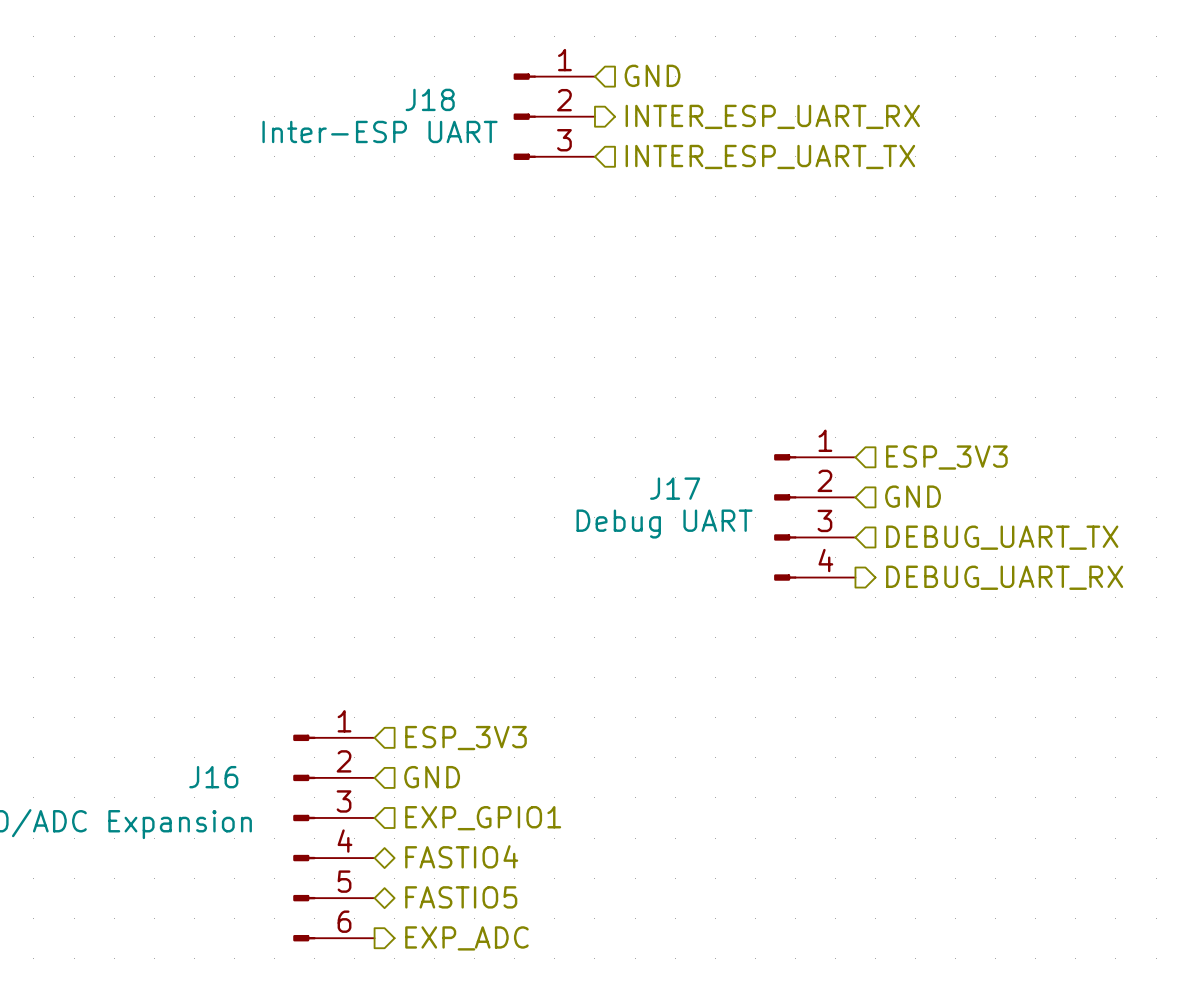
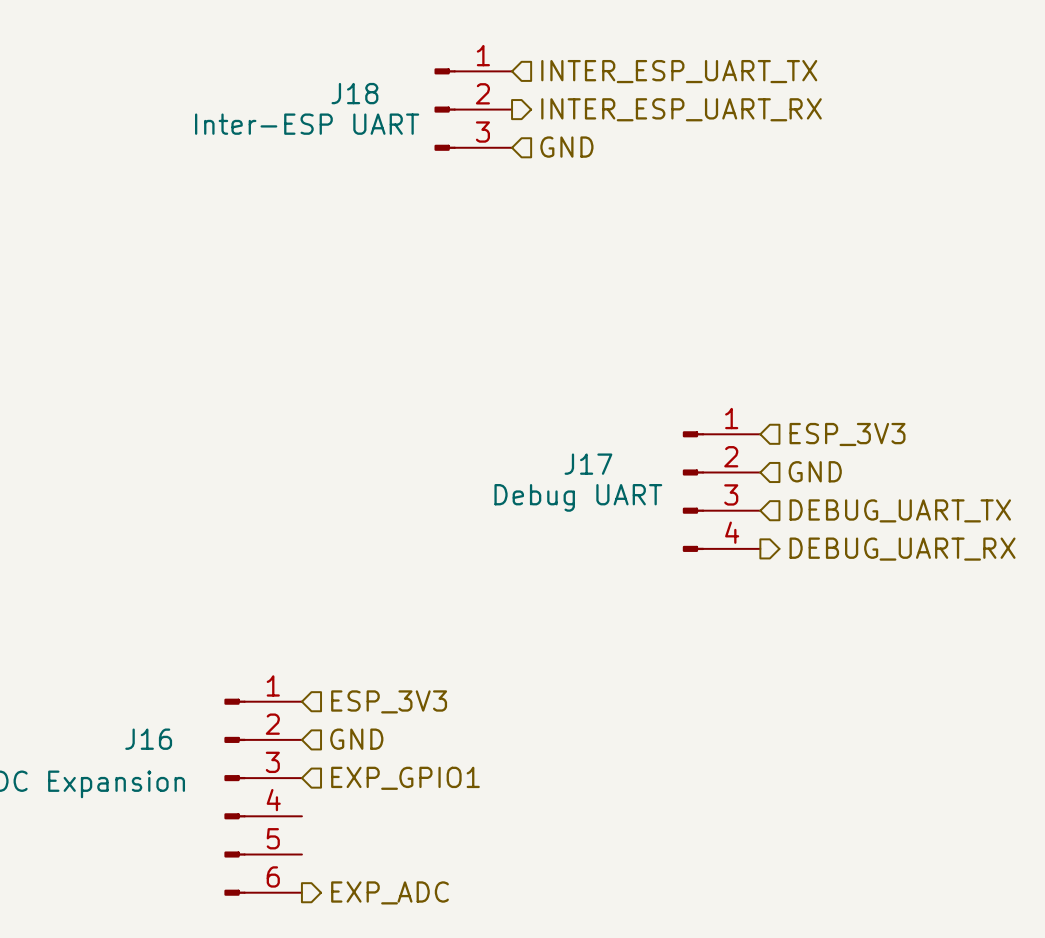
hierarchical label: GND (652, 75) -> INTER_ESP_UART_TX (679, 71)
hierarchical label: INTER_ESP_UART_TX (770, 156) -> GND (566, 147)
hierarchical label: FASTIO4 (461, 856) -> none
hierarchical label: FASTIO5 (461, 897) -> none

